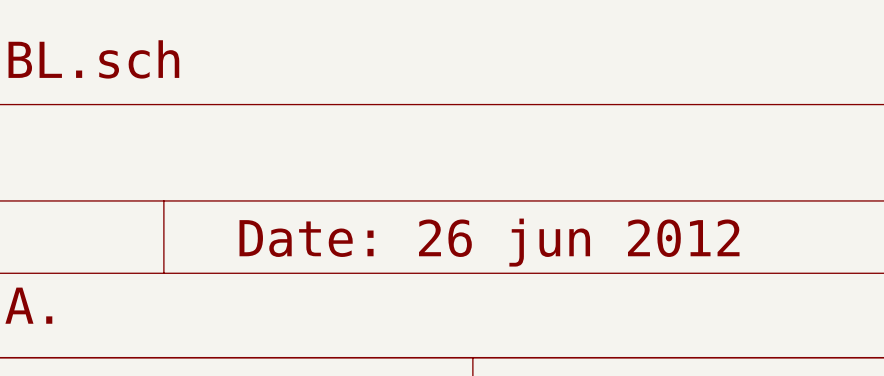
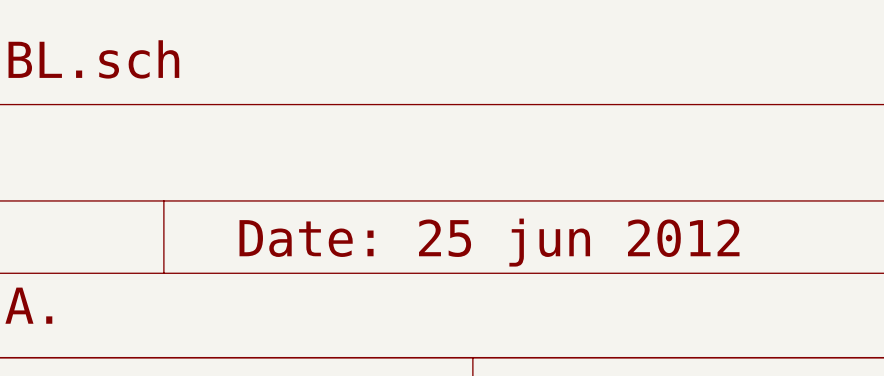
title block: Date: 26 jun 2012 (489, 242) -> Date: 25 jun 2012 (489, 242)

